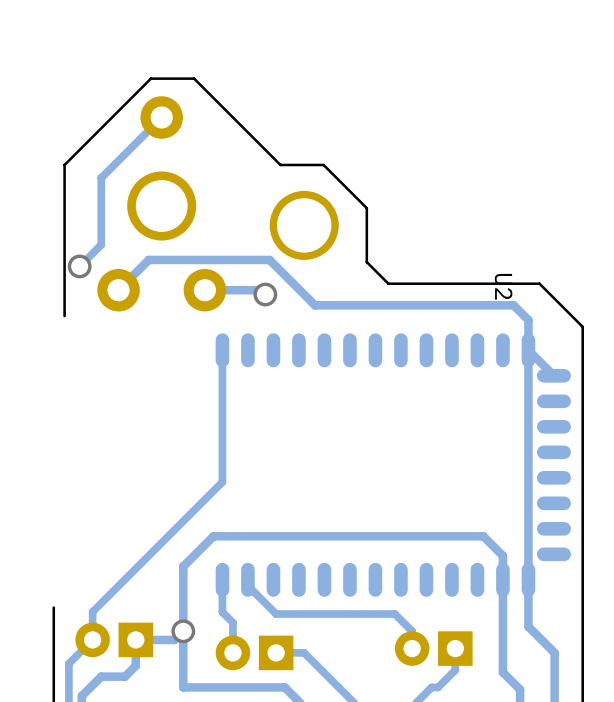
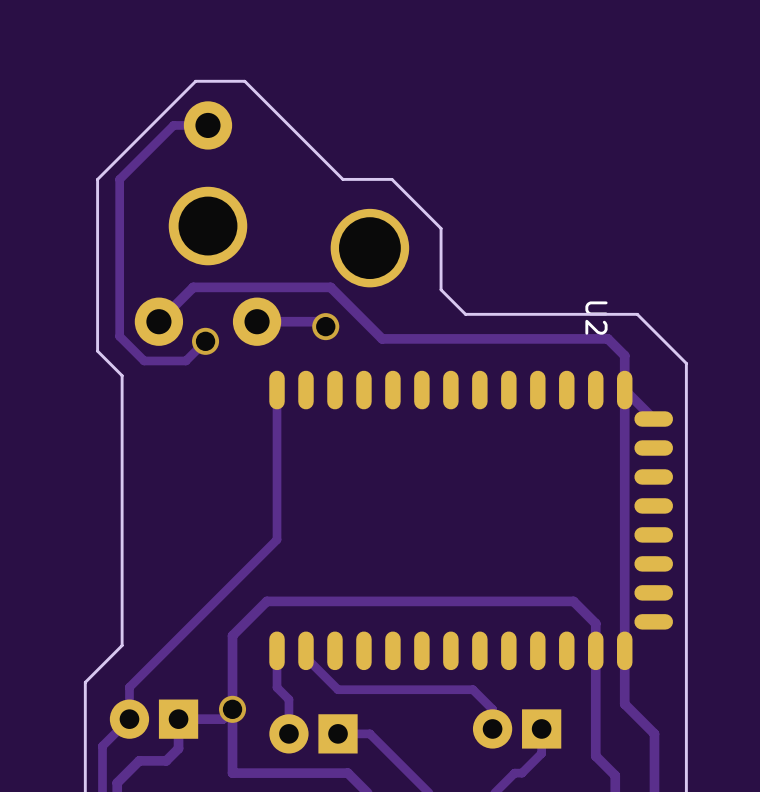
track: (161, 117) (101, 177) (101, 244) (79, 266) -> (207, 125) (173, 125) (119, 179) (119, 336) (144, 360) (185, 360) (205, 341)
via position: (79, 266) -> (205, 341)
board edge: none -> (97, 351) (122, 375) (122, 645) (85, 682)

